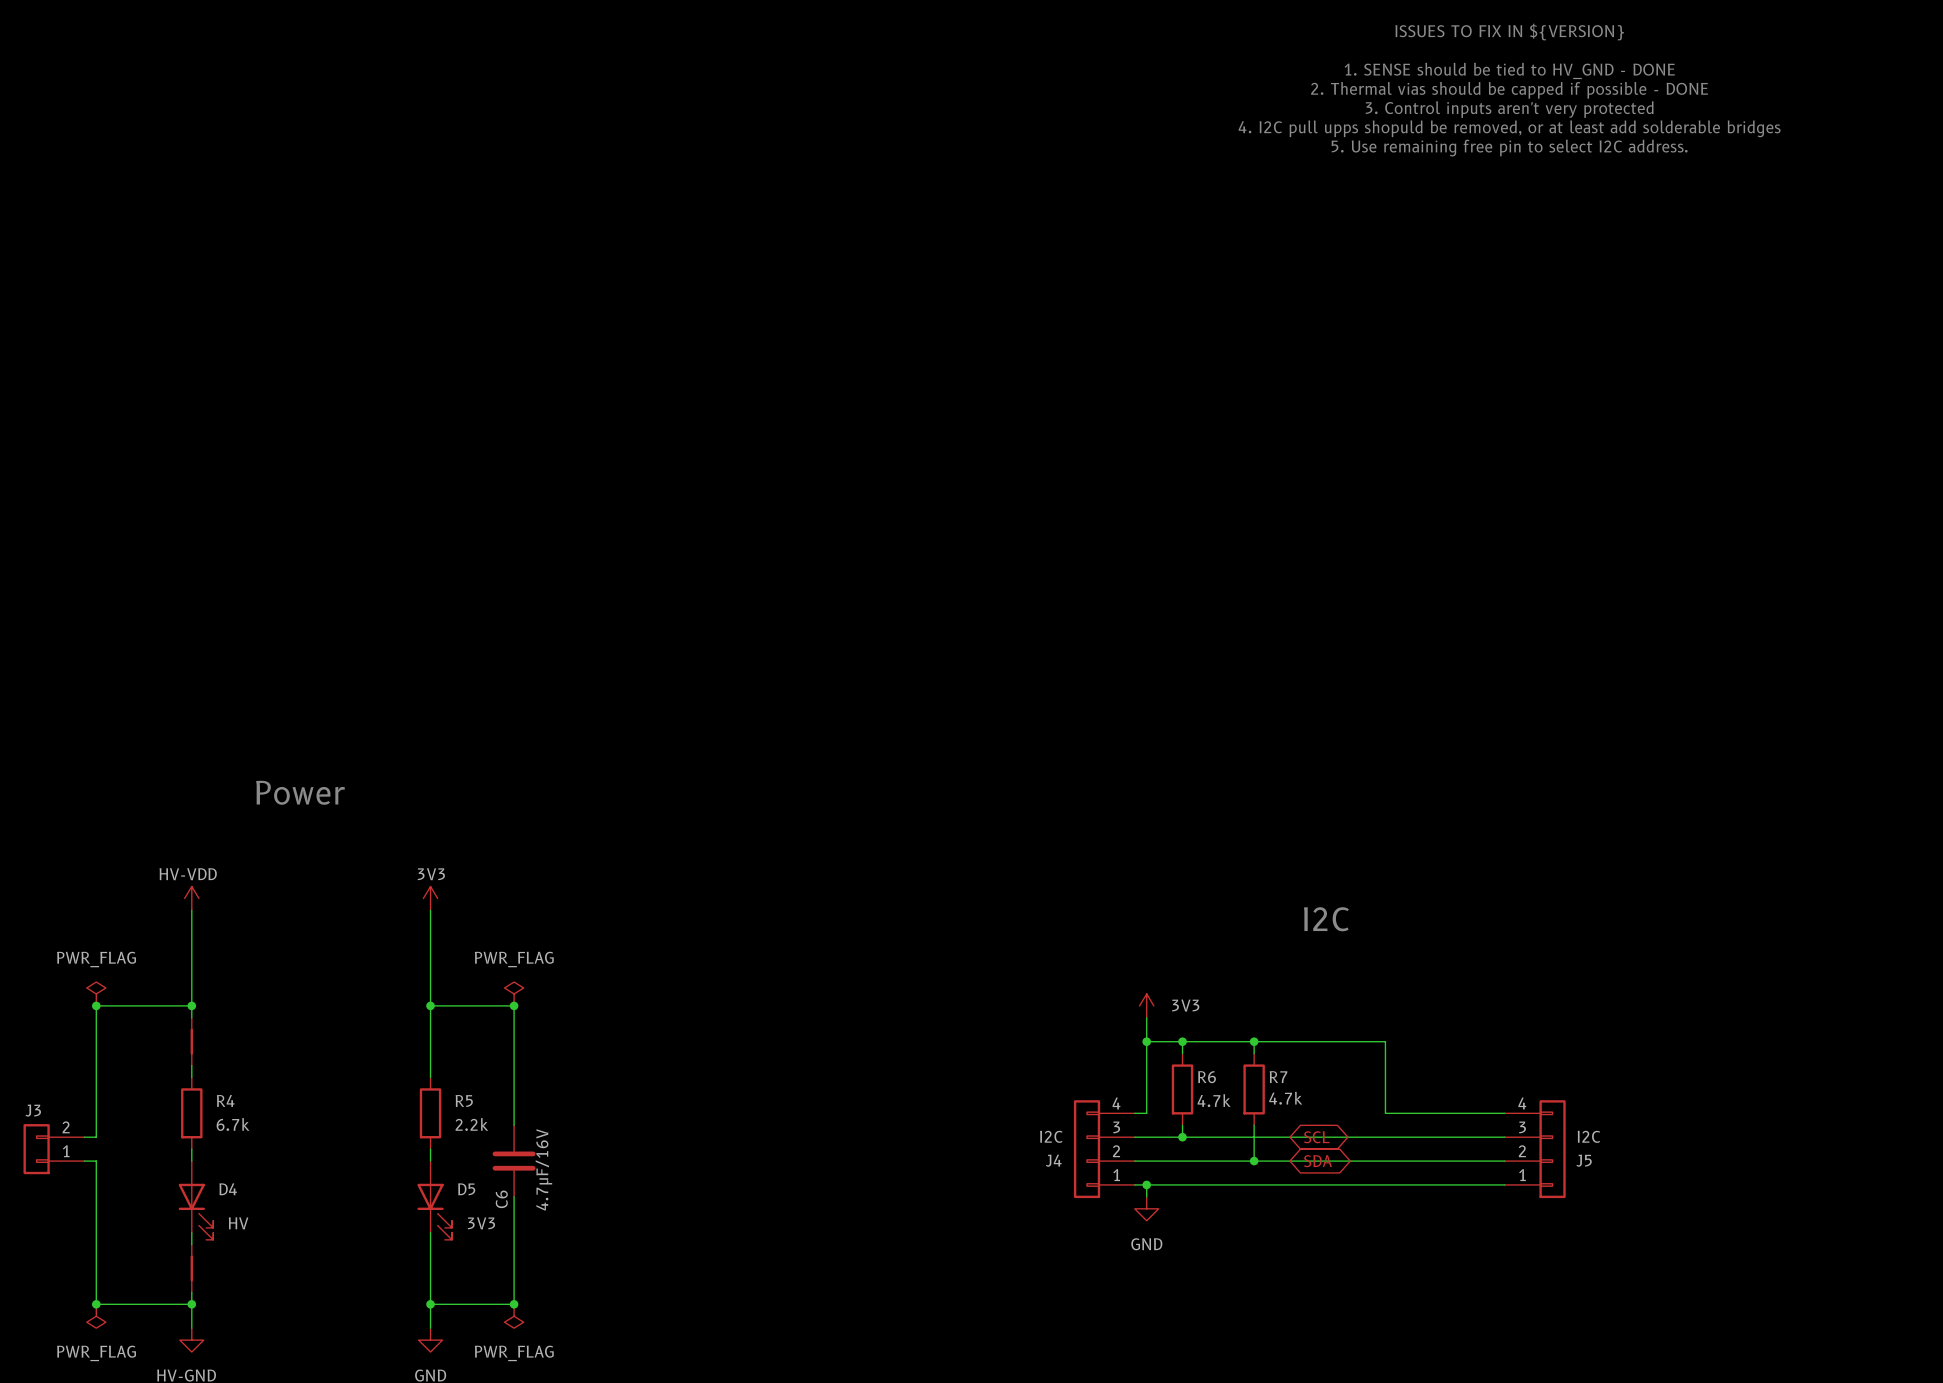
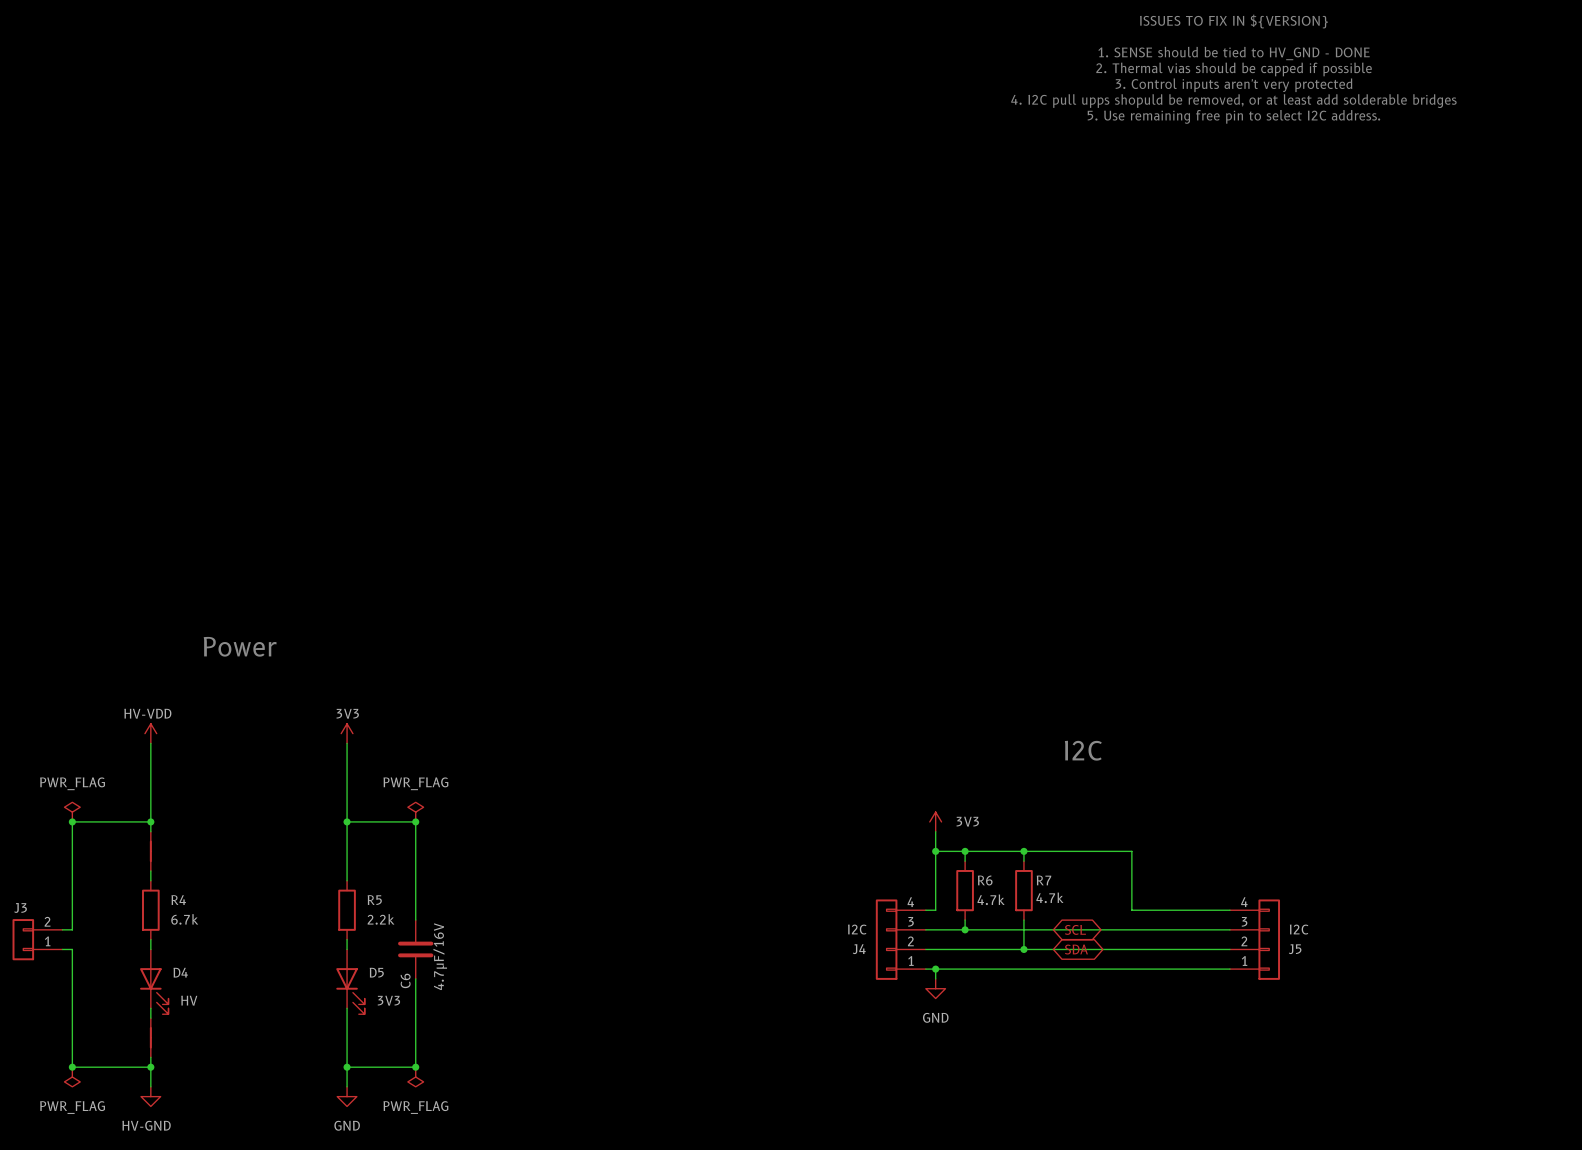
text: 2. Thermal vias should be capped if possible - DONE (1509, 90) -> 2. Thermal vias should be capped if possible (1234, 69)

